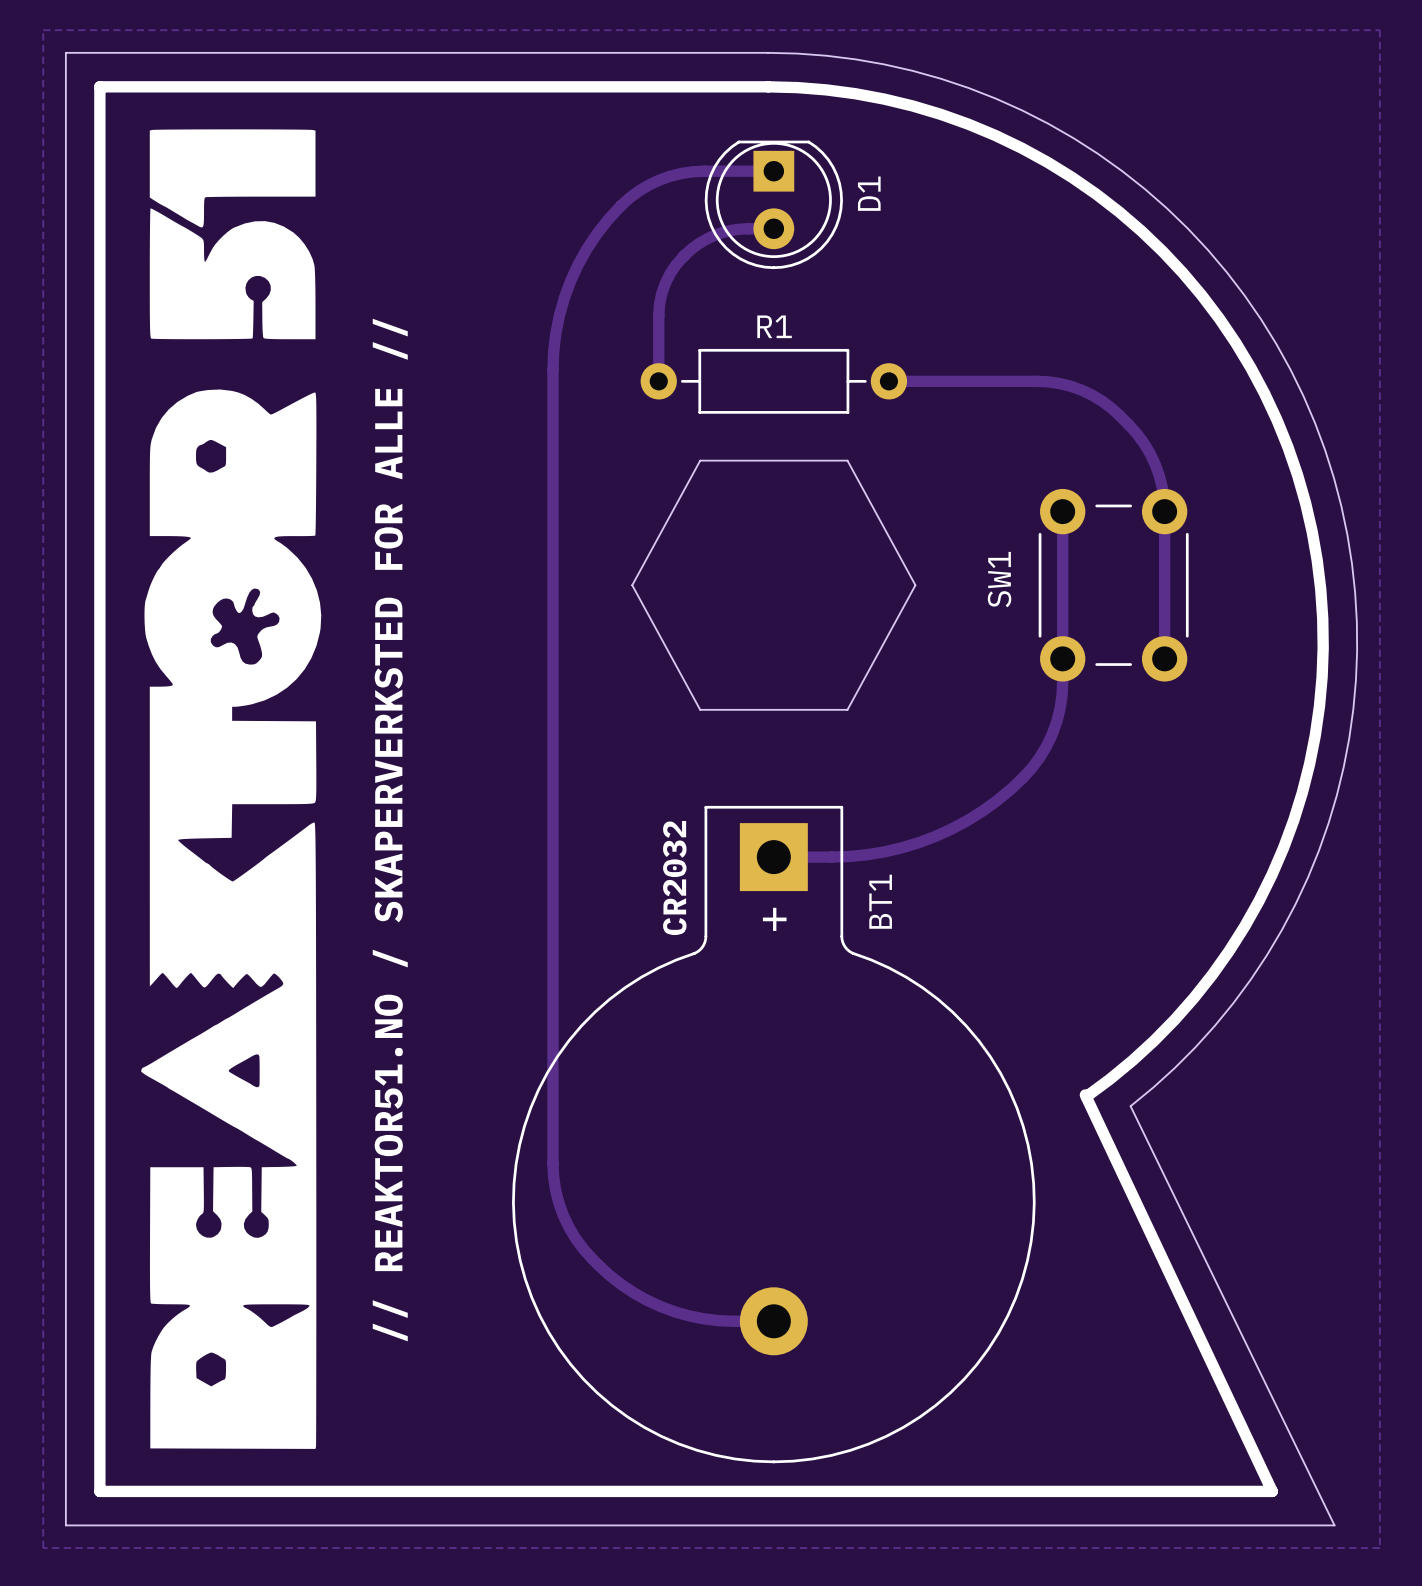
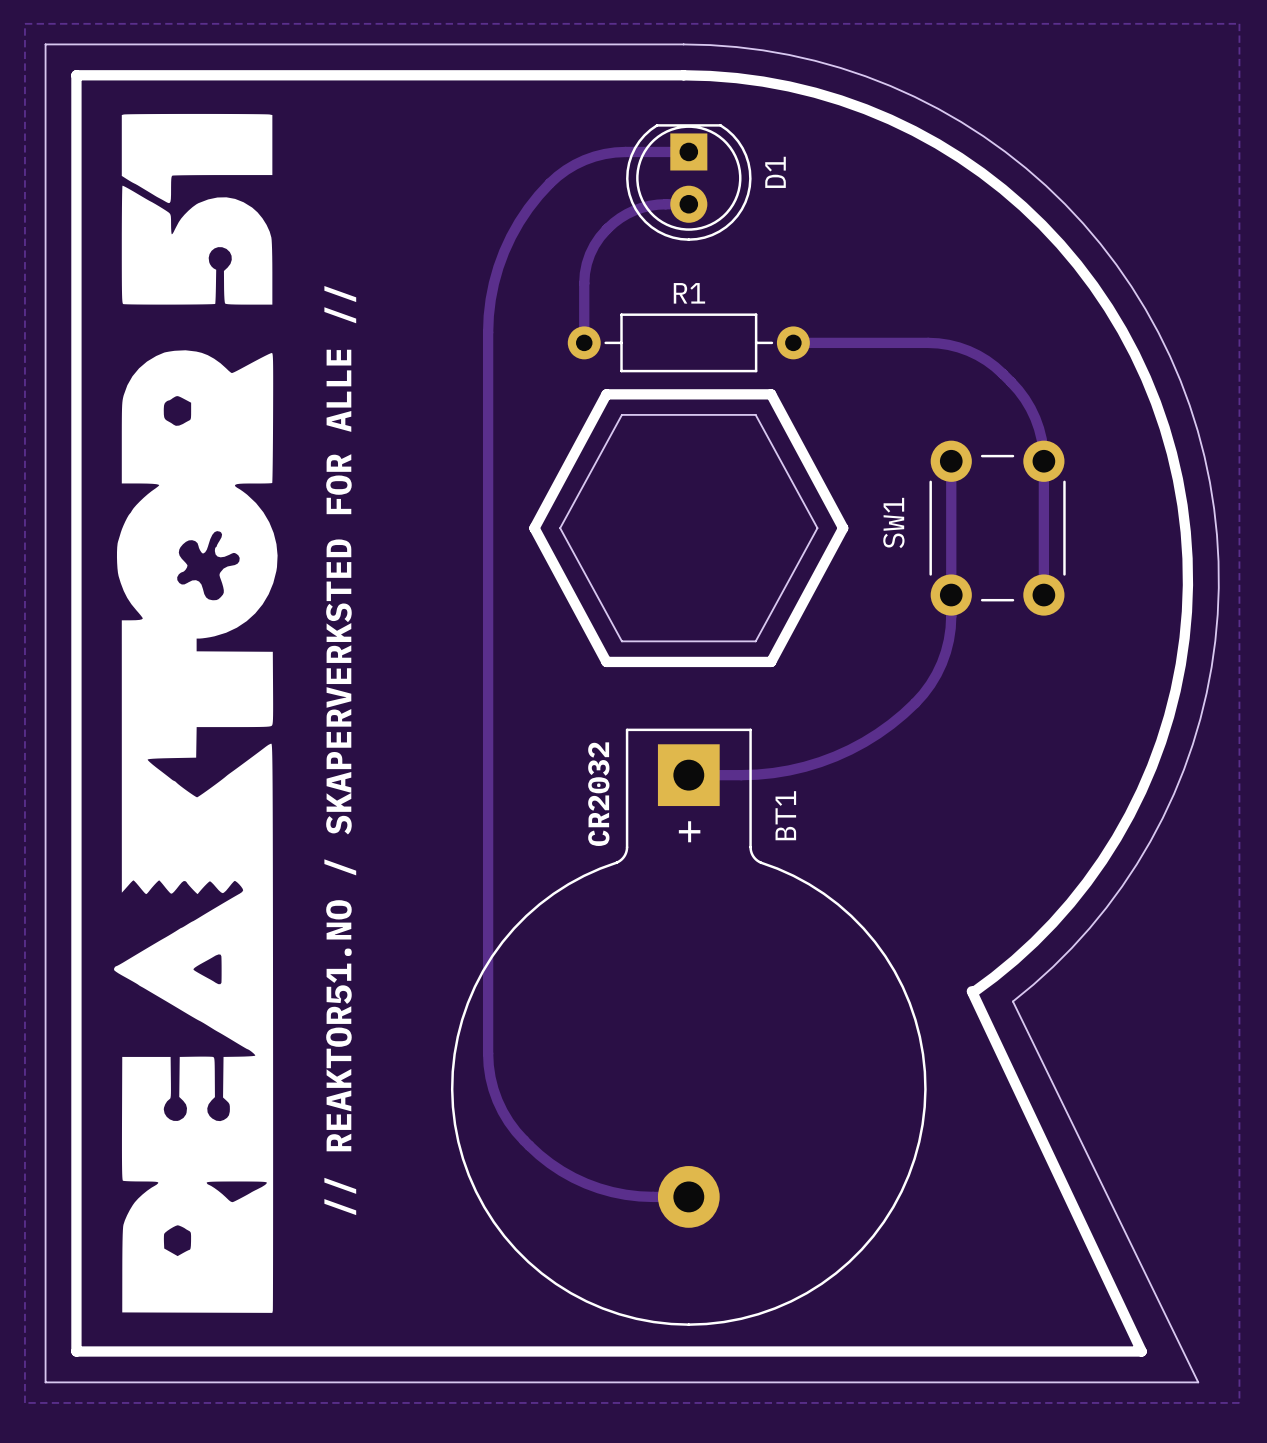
line: none -> (606, 394) (534, 528) (606, 661) (771, 661) (843, 528) (771, 394) (606, 394)

